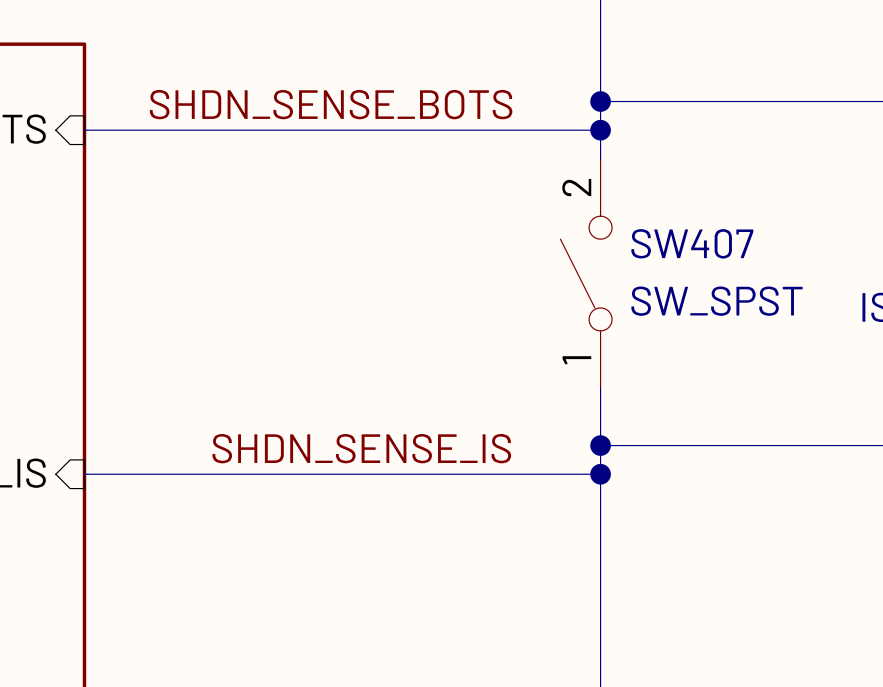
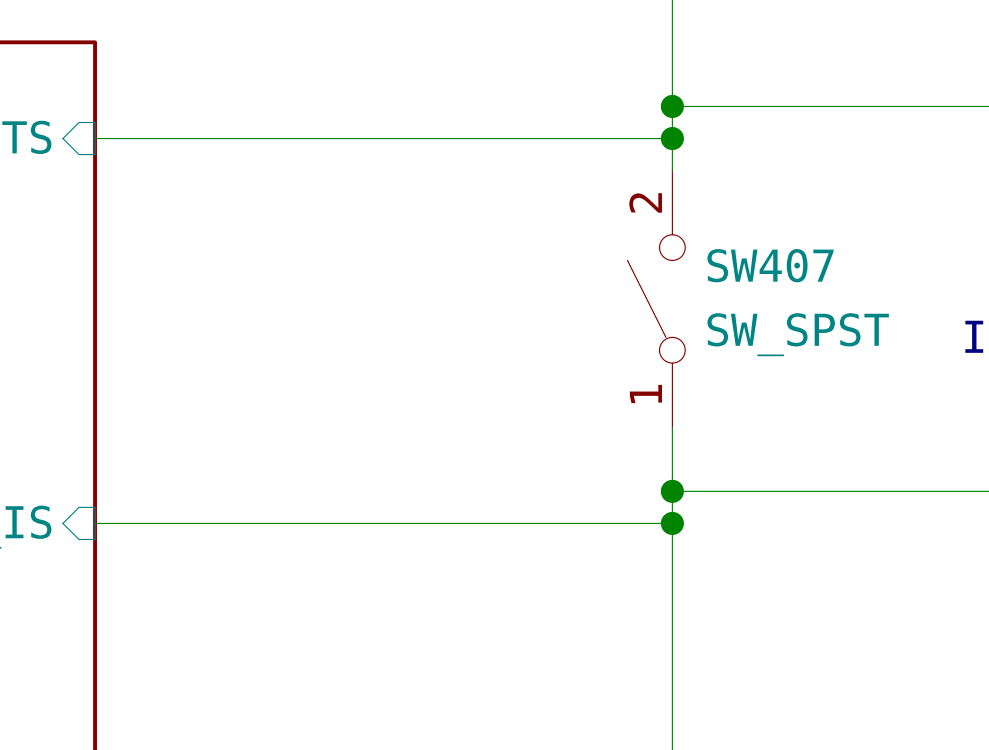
label: SHDN_SENSE_BOTS (331, 104) -> none
label: SHDN_SENSE_IS (361, 448) -> none

